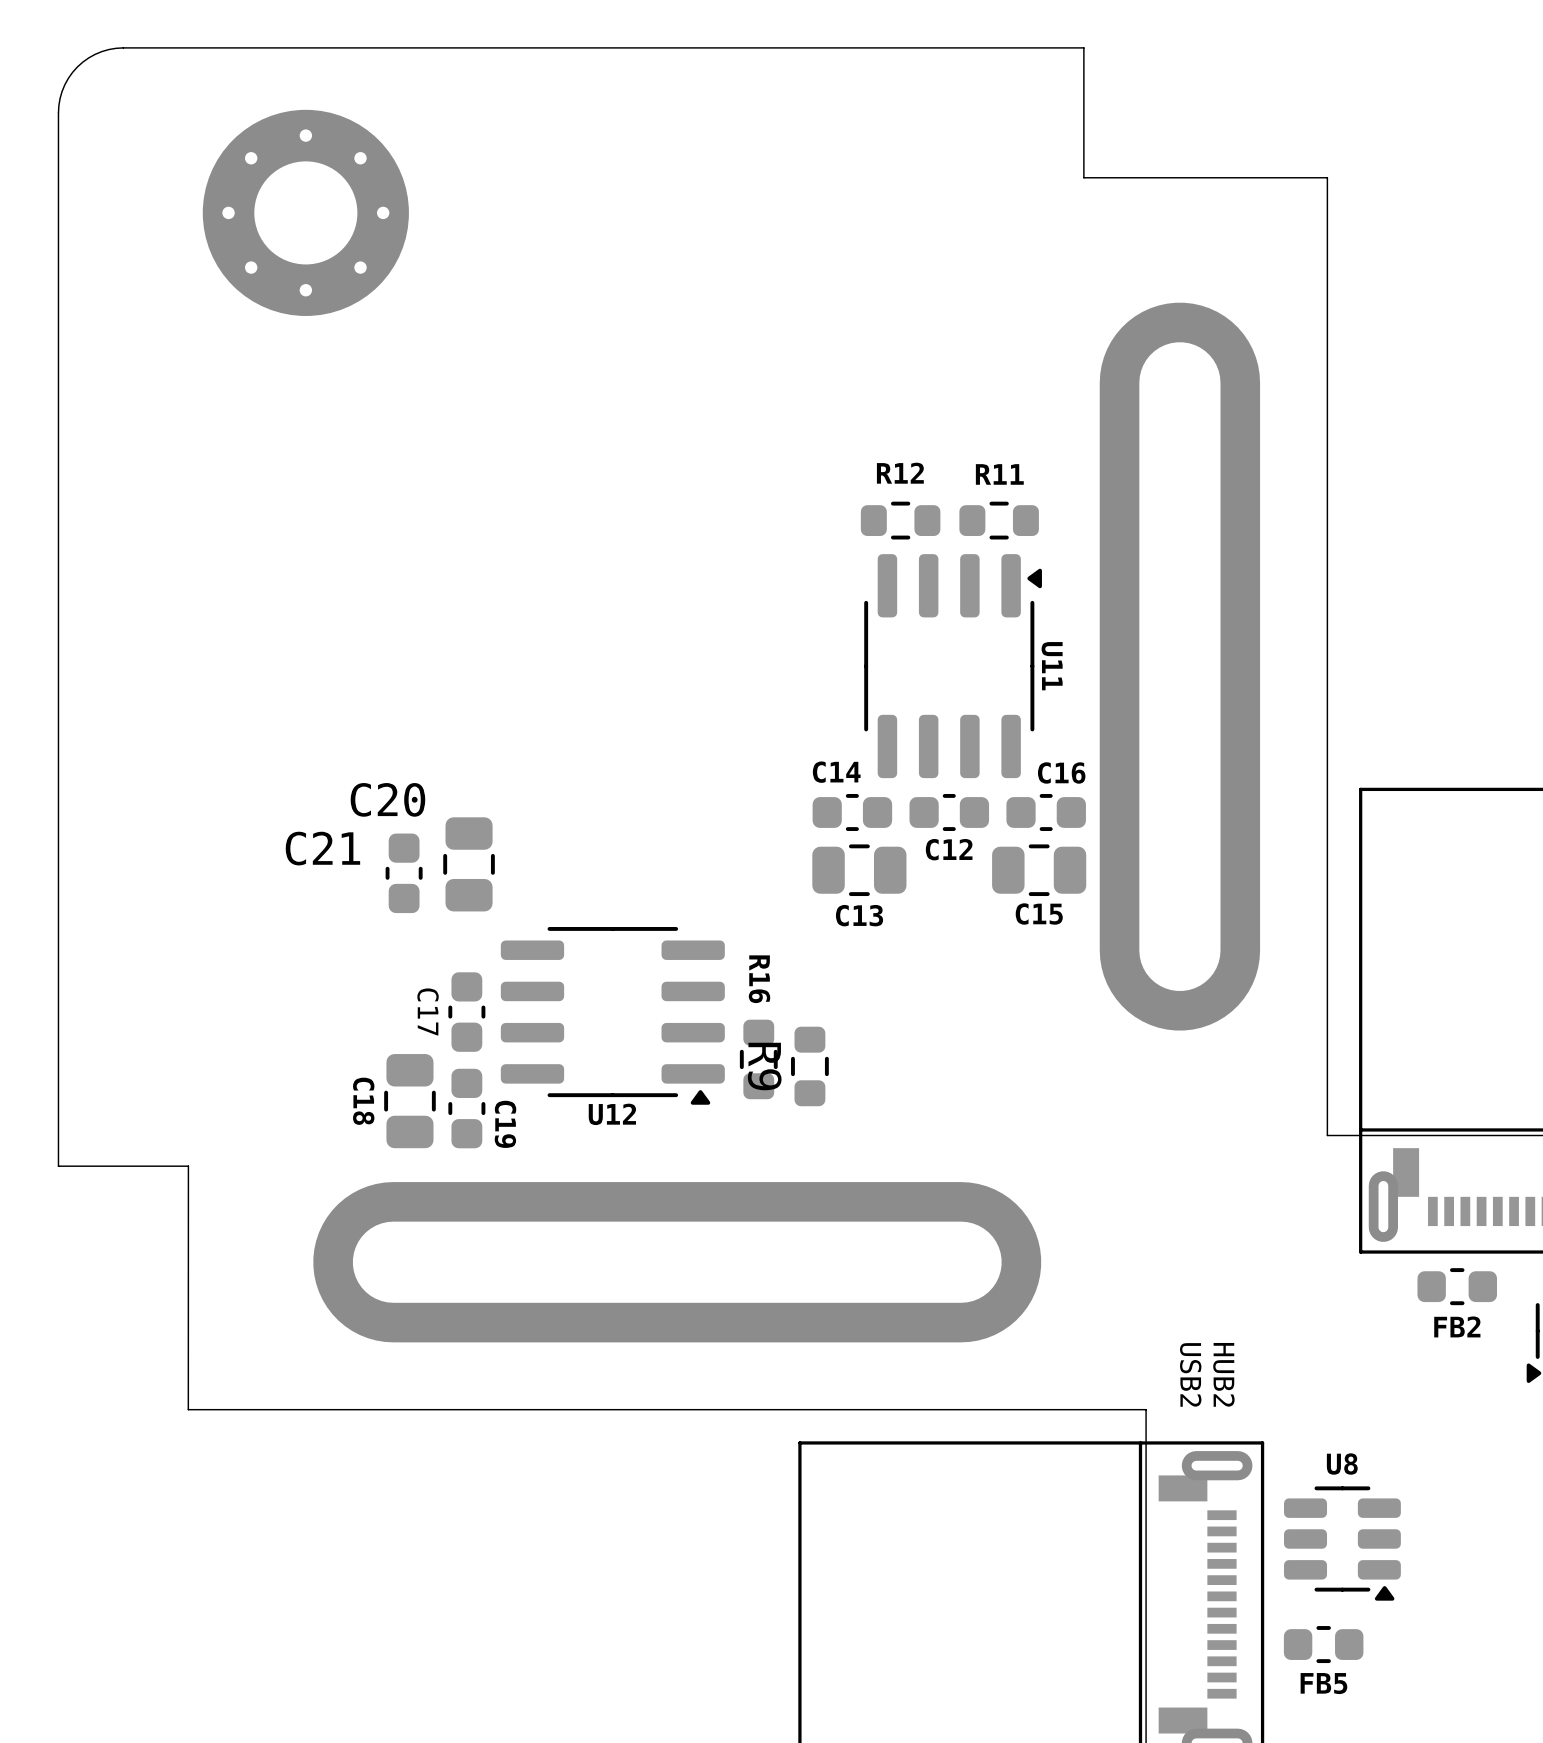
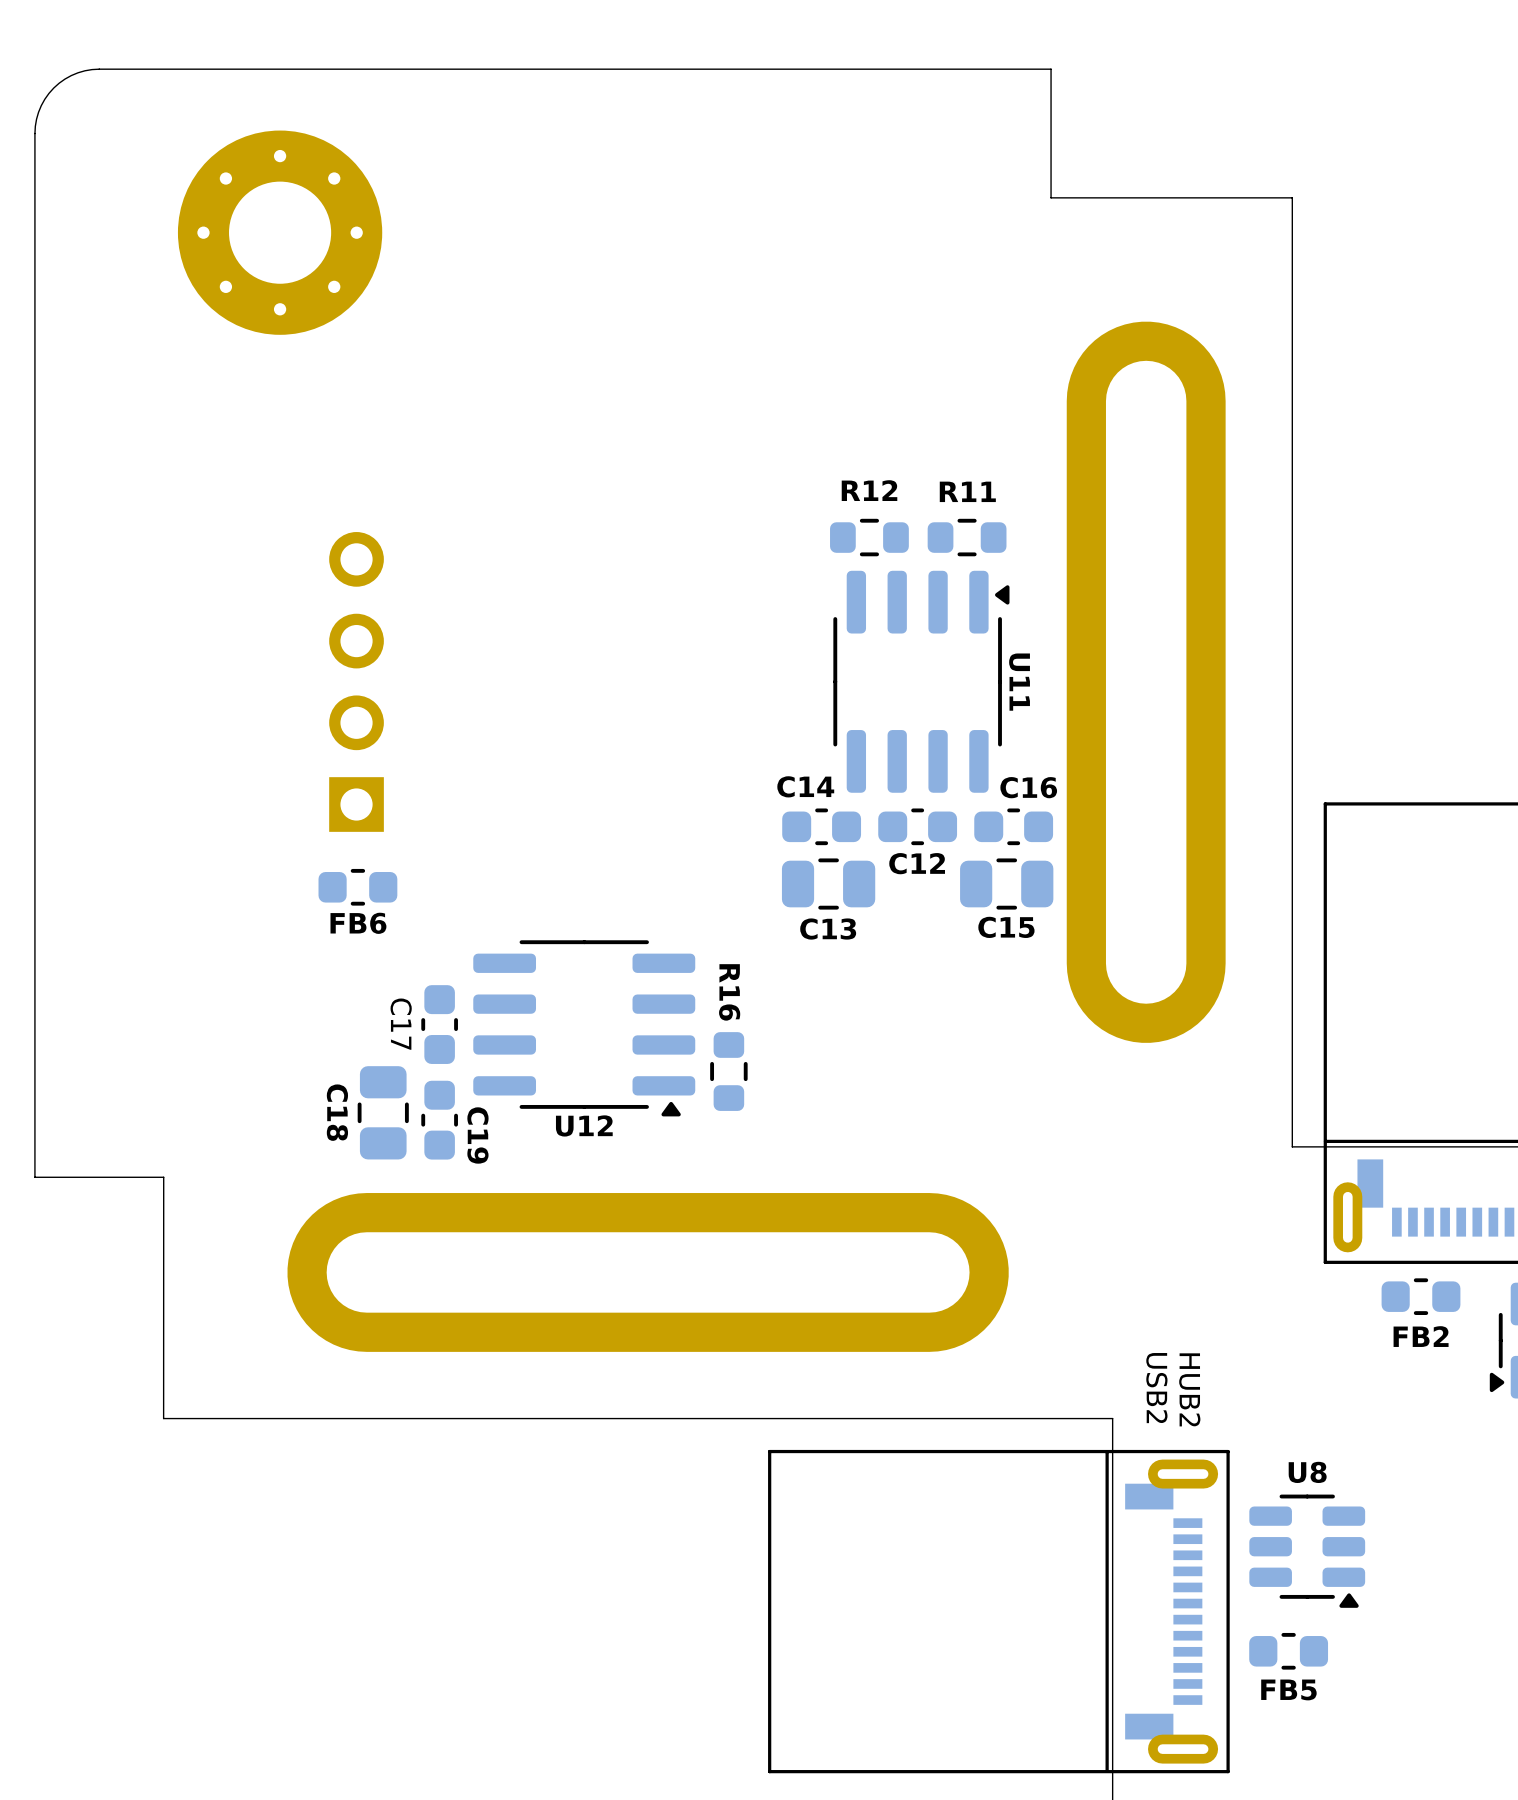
part: none -> (356, 681)
C20: (469, 864) -> none
FB6: none -> (357, 887)
C21: (404, 873) -> none
R9: (809, 1066) -> none

